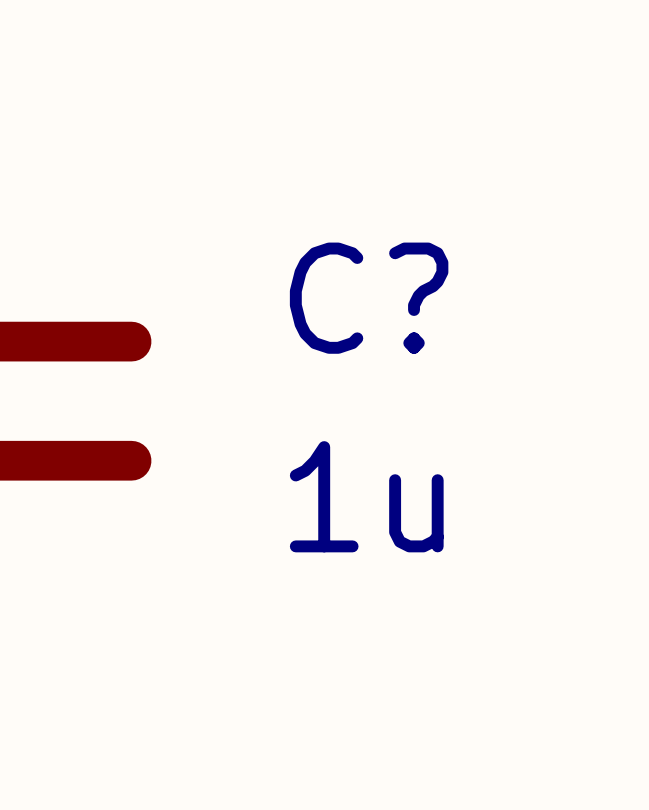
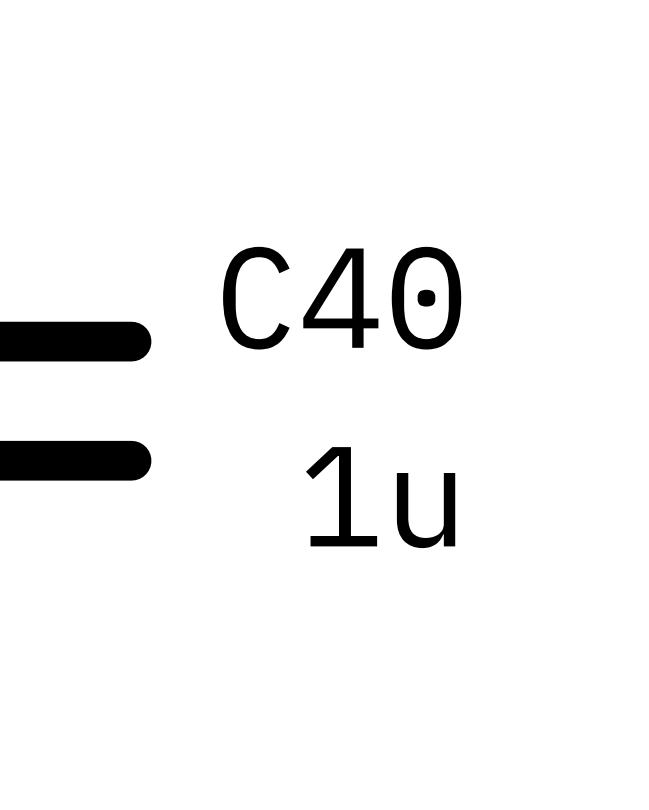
C? name: C? (369, 298) -> C40 (342, 298)

